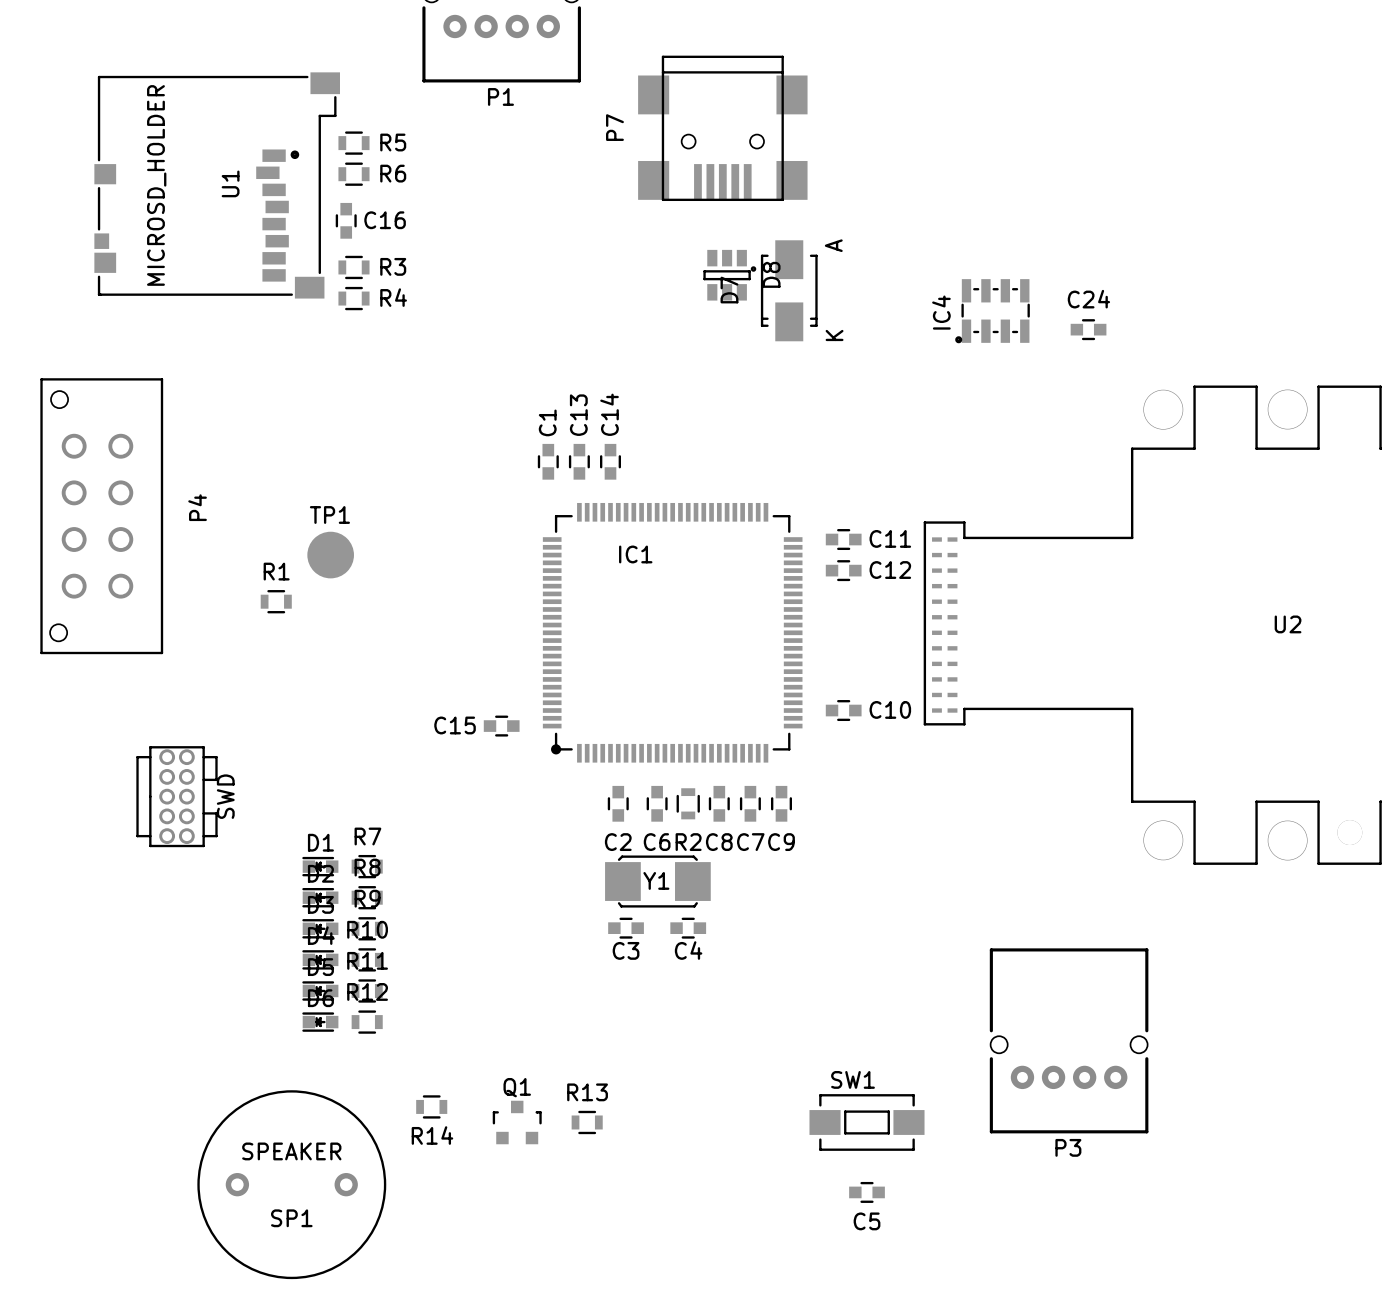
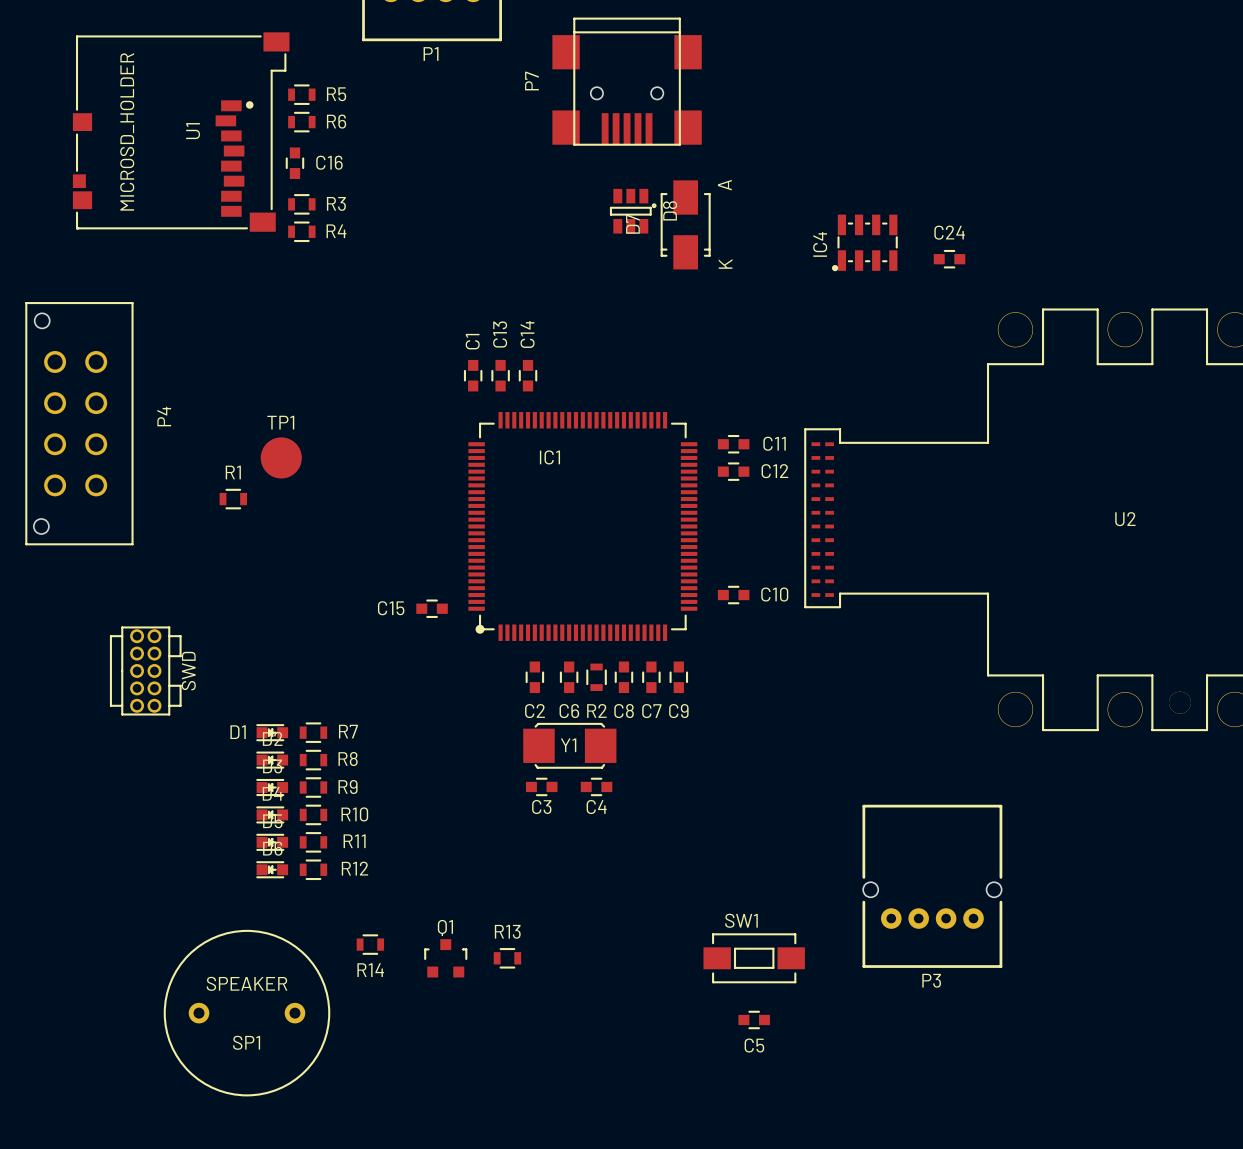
R7 name position: R7 (367, 836) -> R7 (348, 731)
D1 name position: D1 (320, 842) -> D1 (238, 732)
R8 name position: R8 (367, 867) -> R8 (348, 759)
R9 name position: R9 (367, 898) -> R9 (348, 787)
R10 name position: R10 (367, 929) -> R10 (354, 814)
R11 name position: R11 (367, 960) -> R11 (354, 841)
R12 name position: R12 (367, 991) -> R12 (354, 868)

